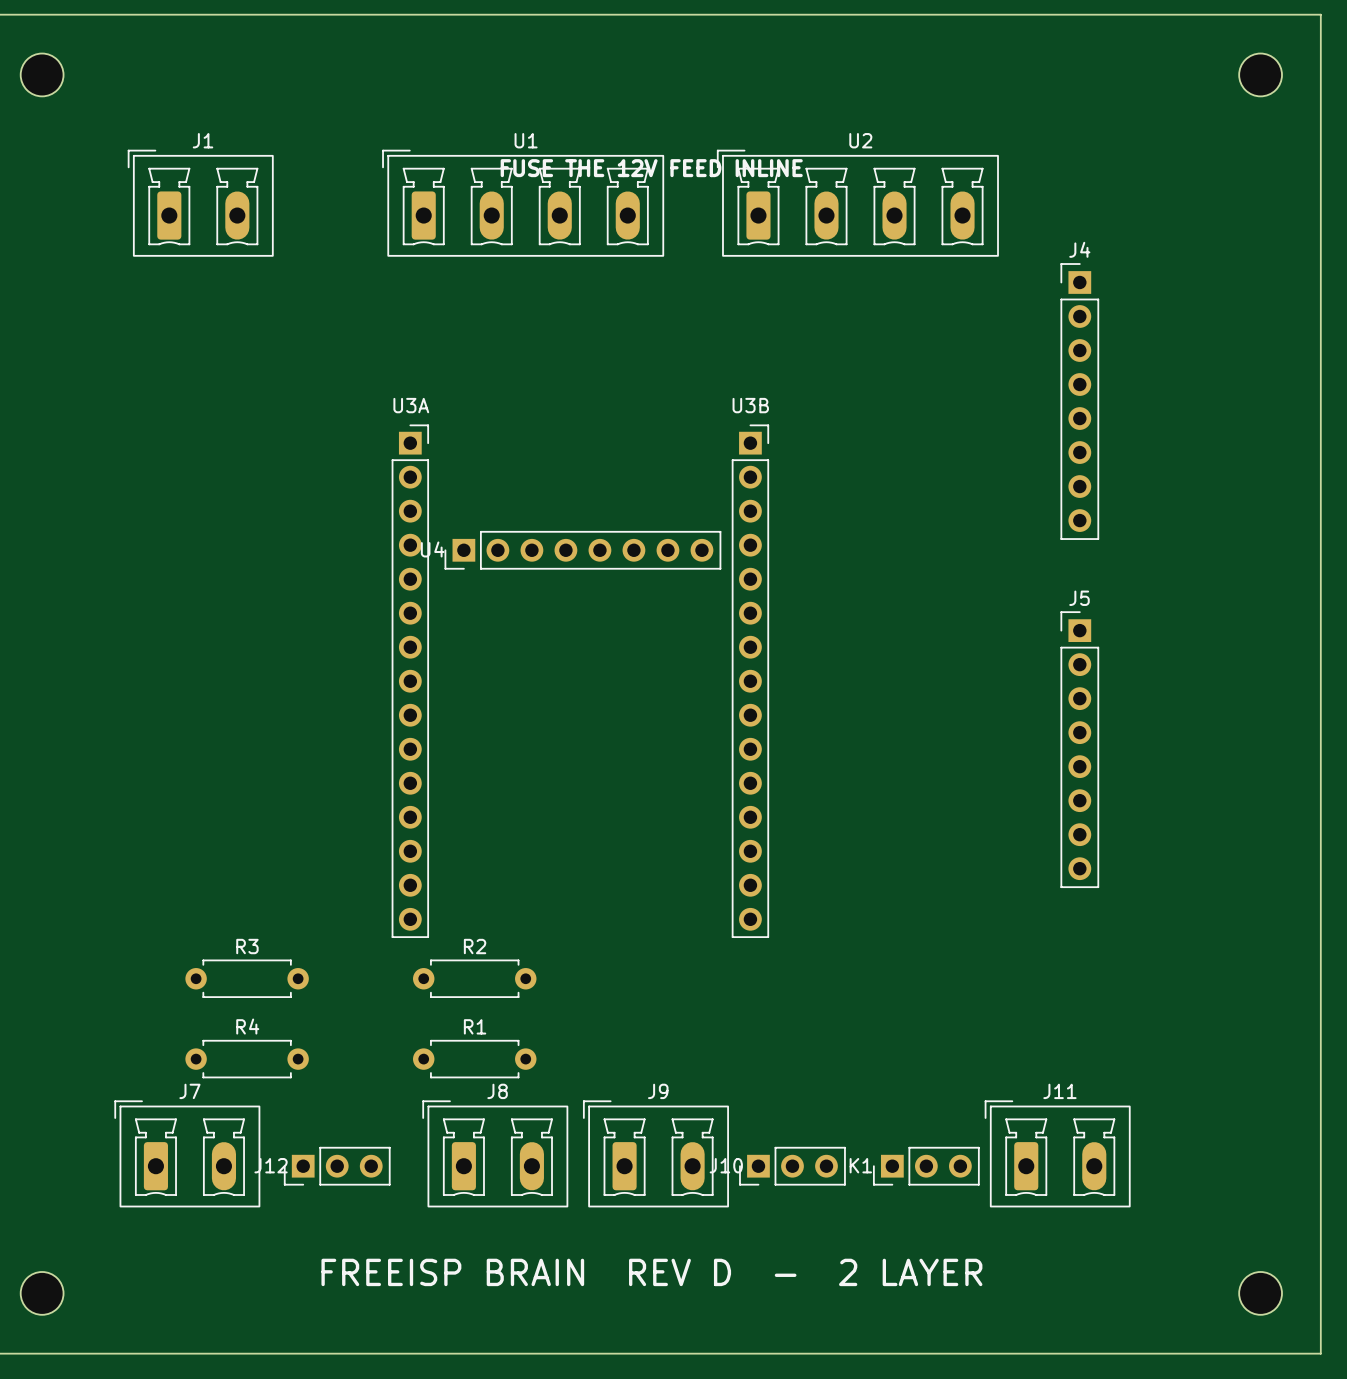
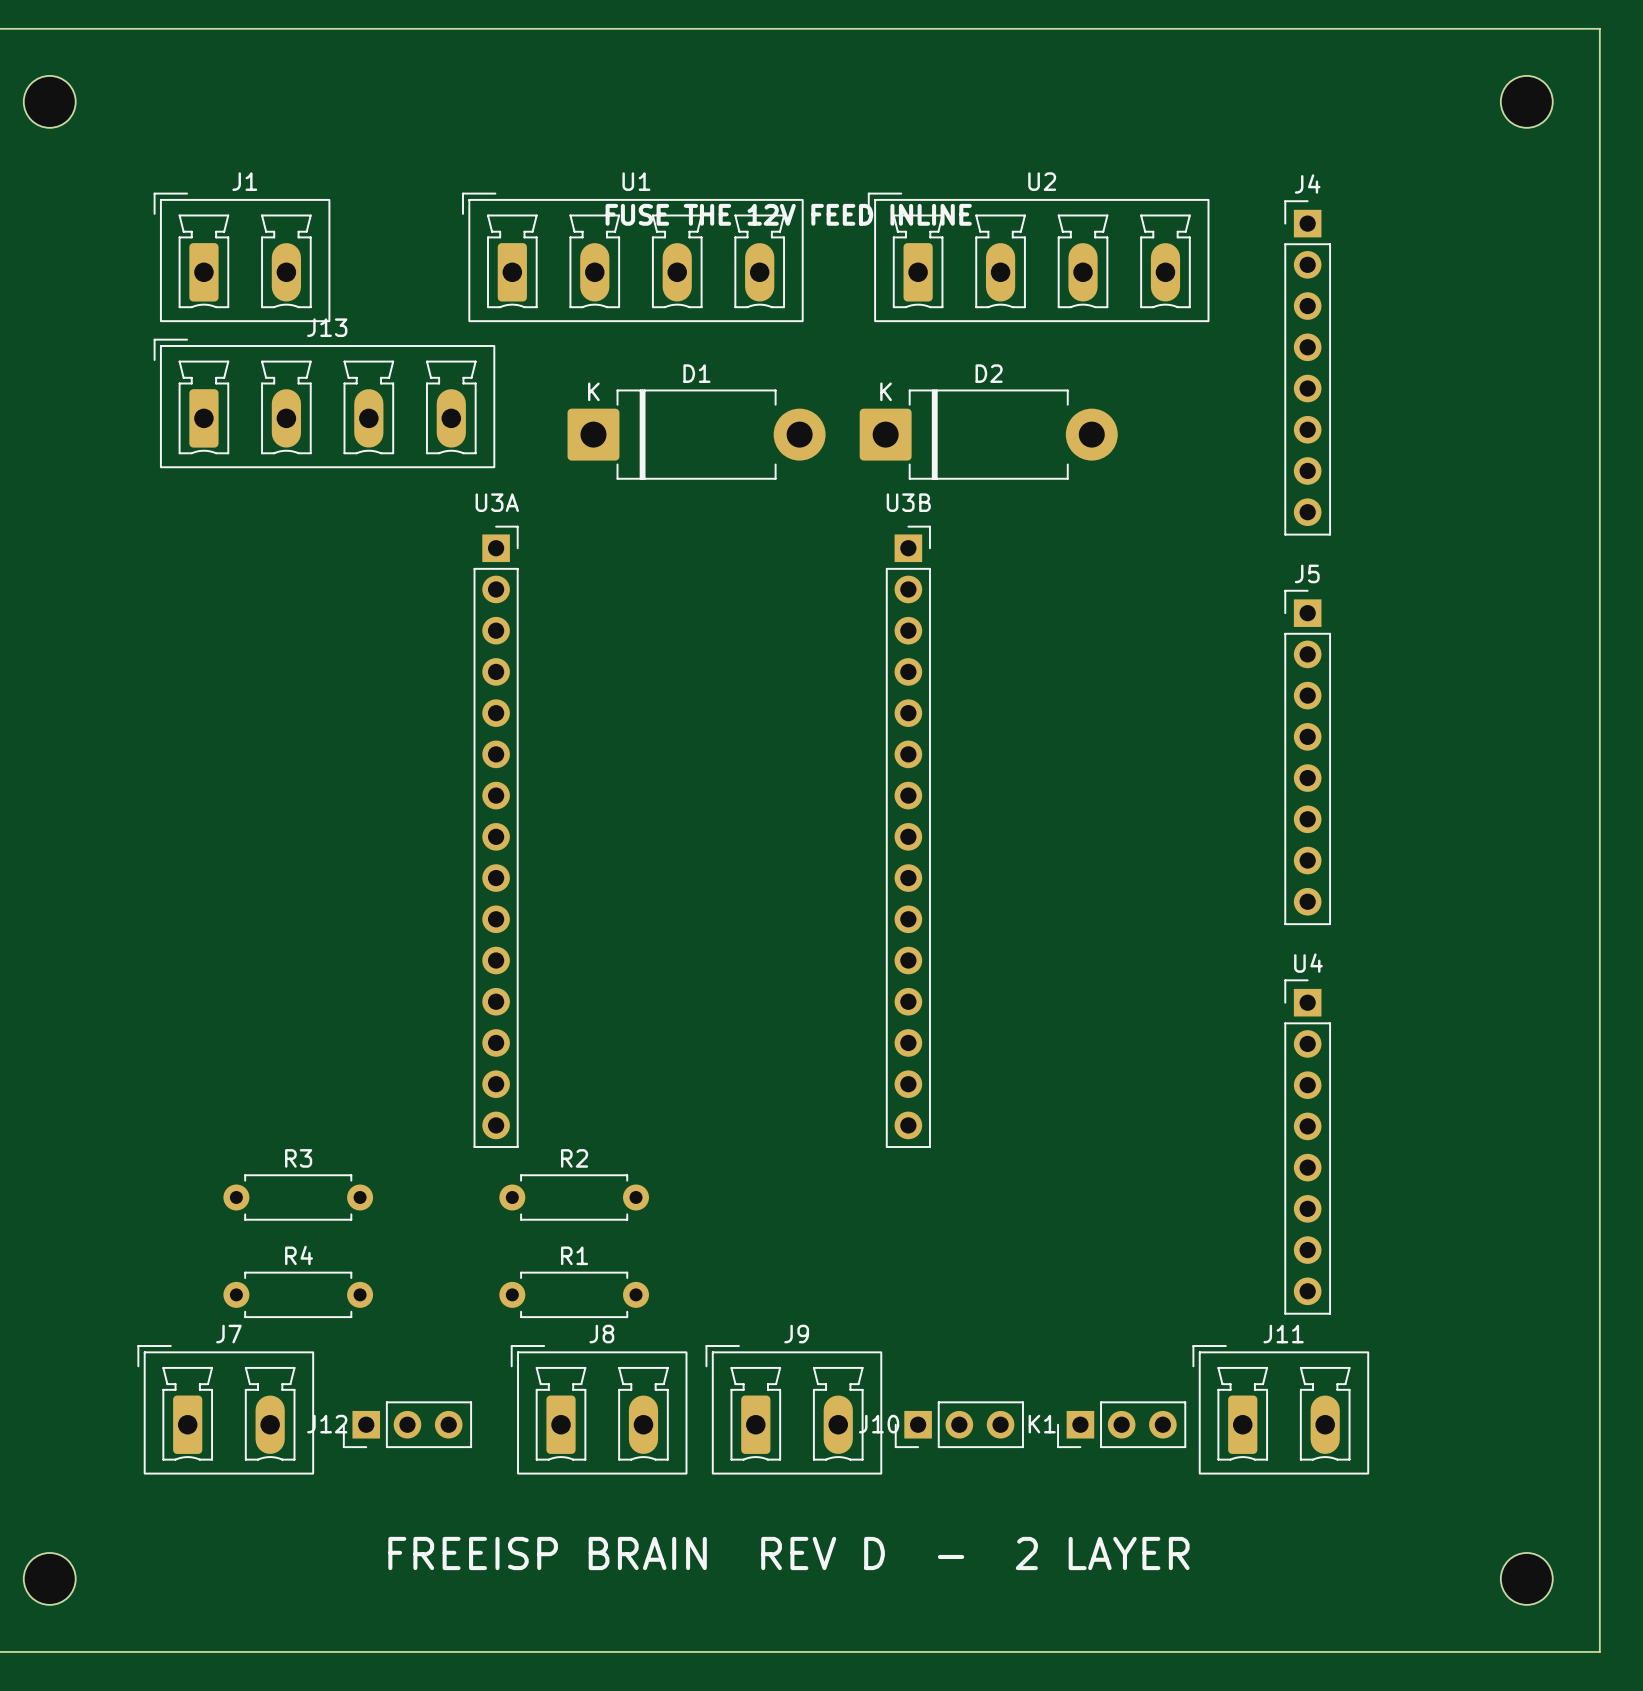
J13: none -> (324, 403)
D1: none -> (696, 434)
D2: none -> (988, 434)
J4 position: (1079, 401) -> (1307, 367)
U4 rotation: 0° (582, 550) -> 90° clockwise (1307, 1147)
U4 position: (582, 550) -> (1307, 1147)
J5 position: (1079, 749) -> (1307, 757)

